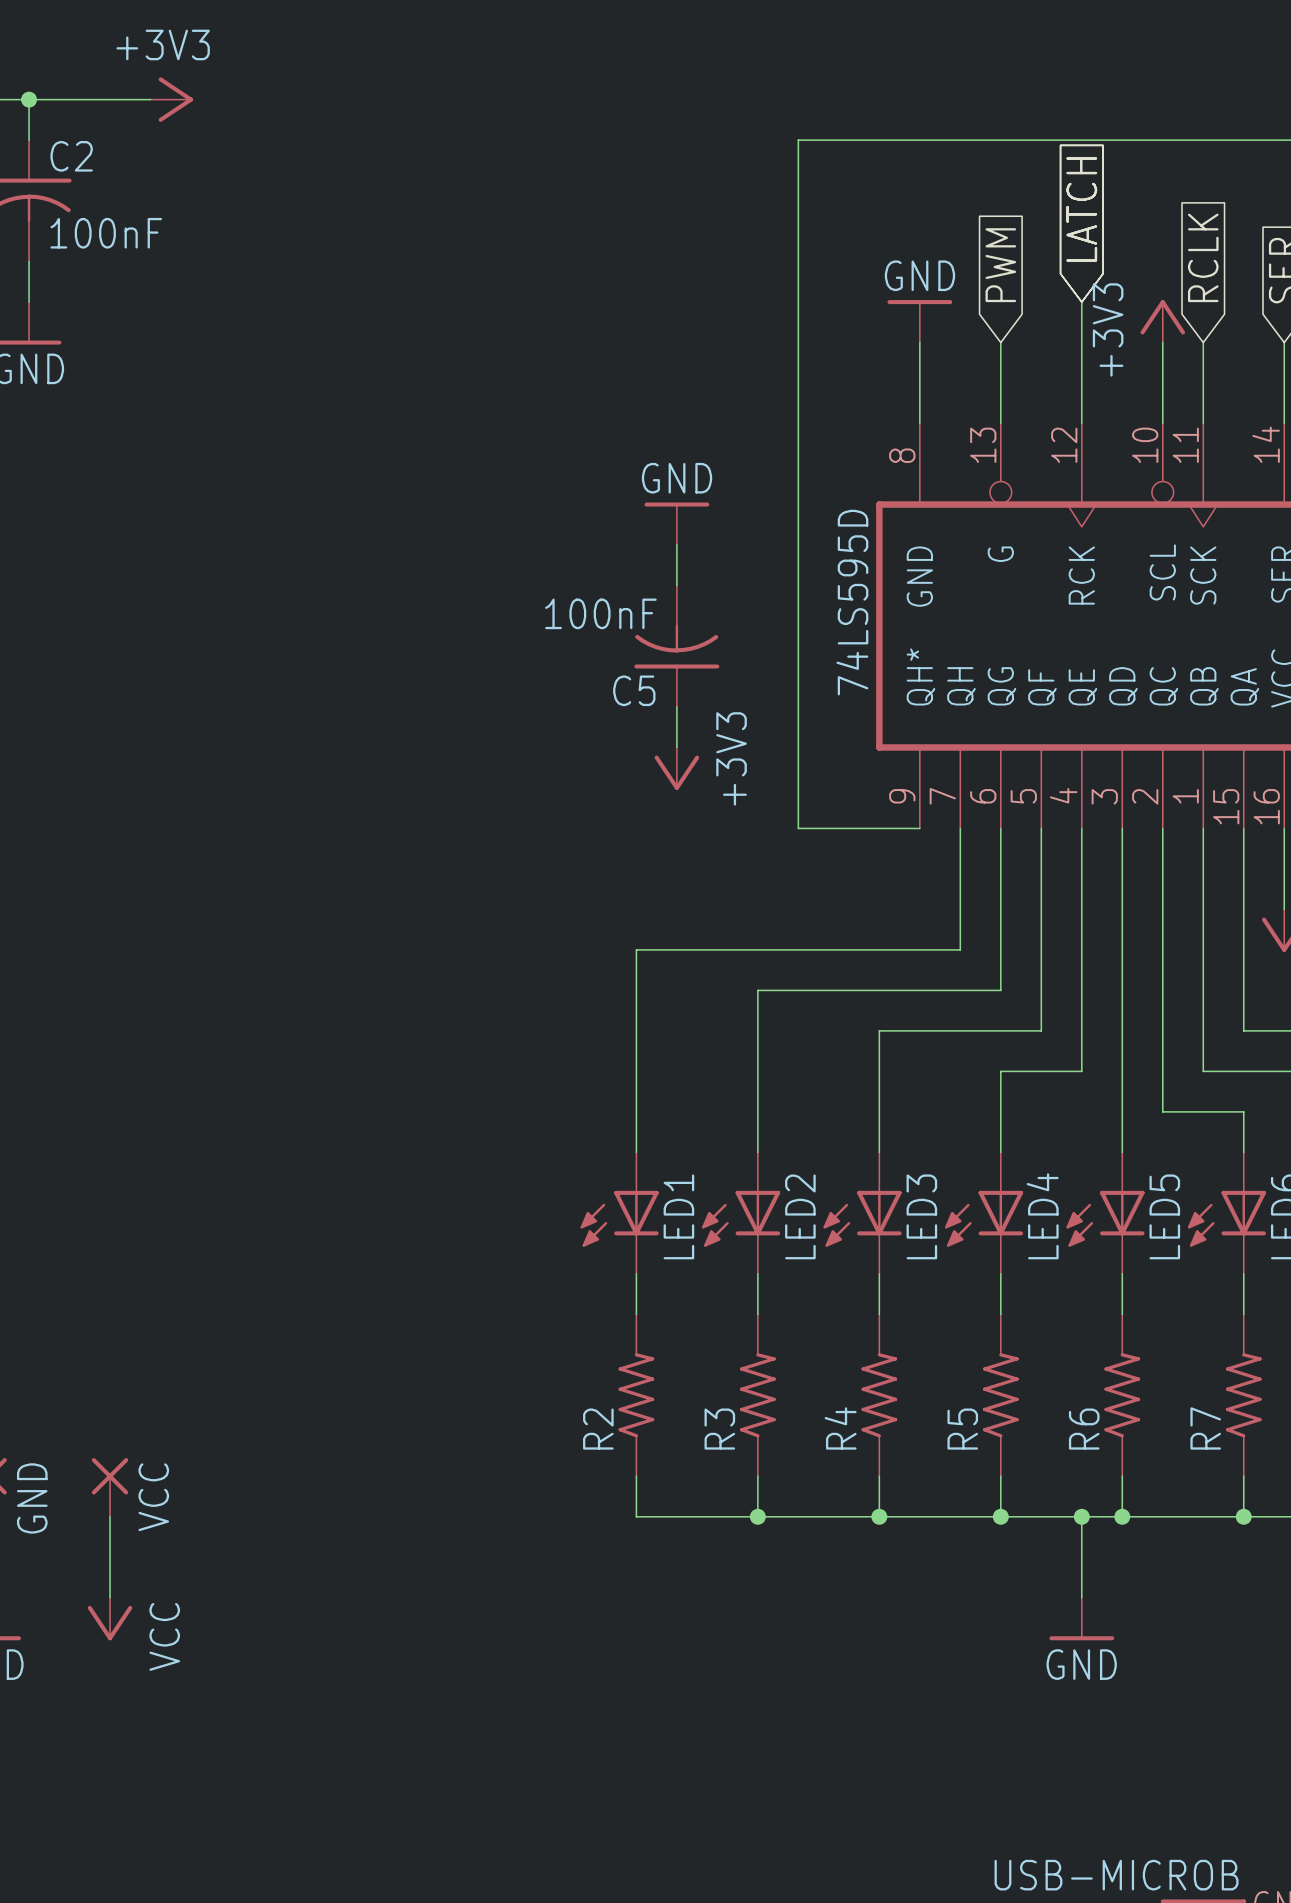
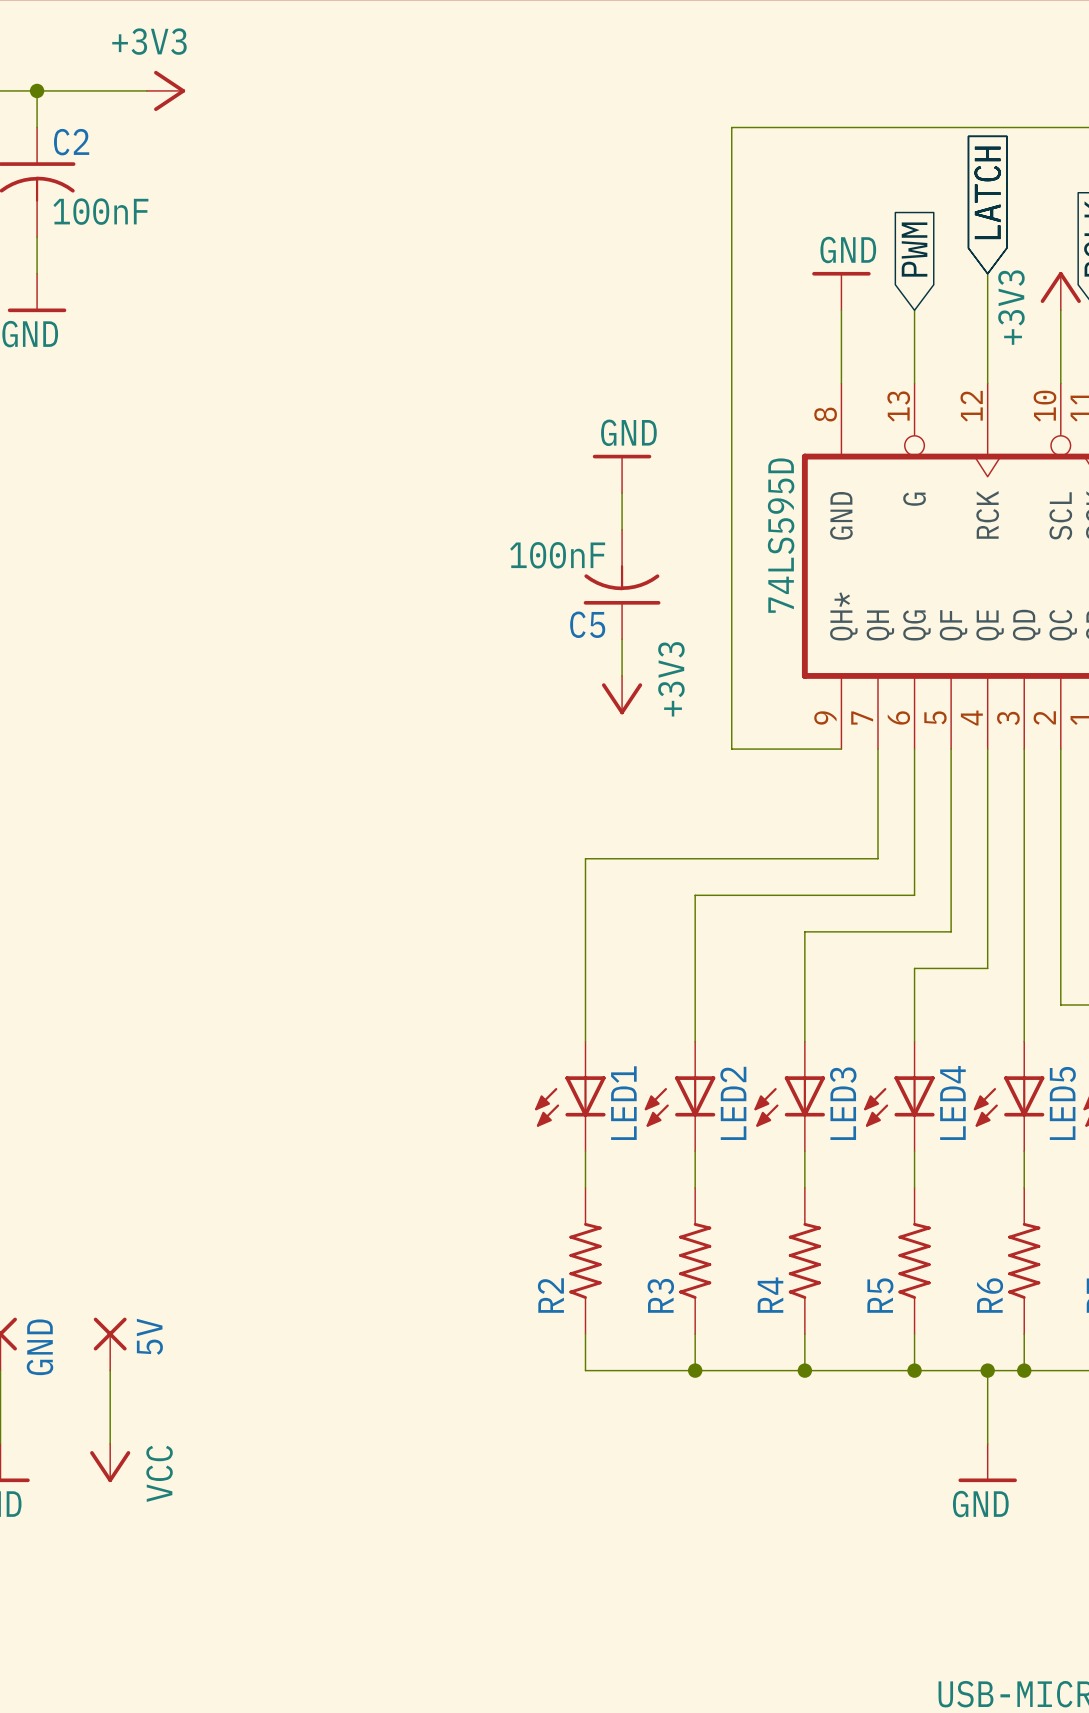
VCC name: VCC (153, 1497) -> 5V (149, 1336)

